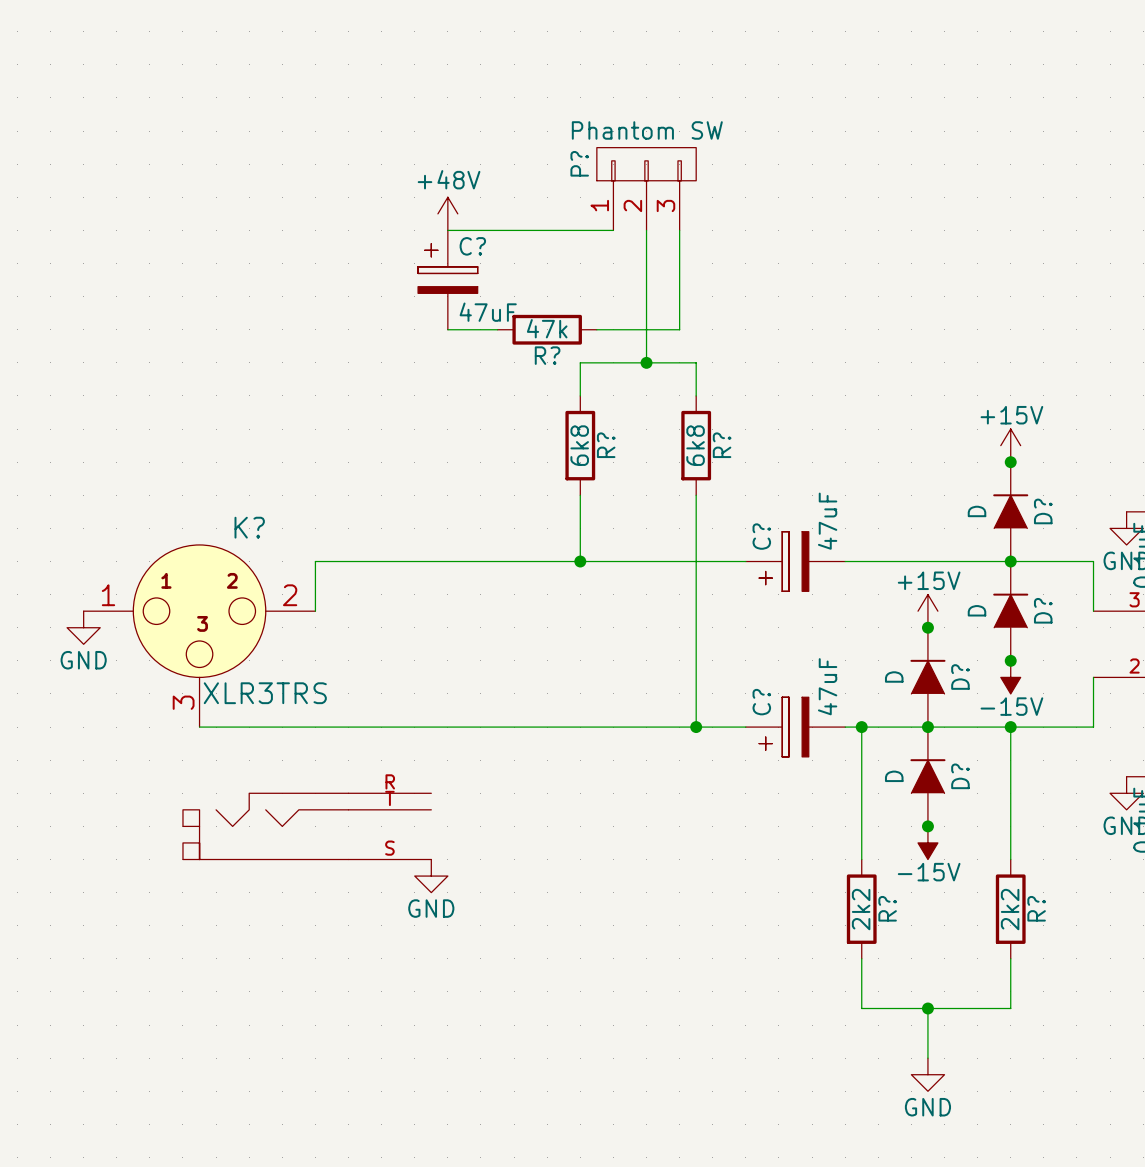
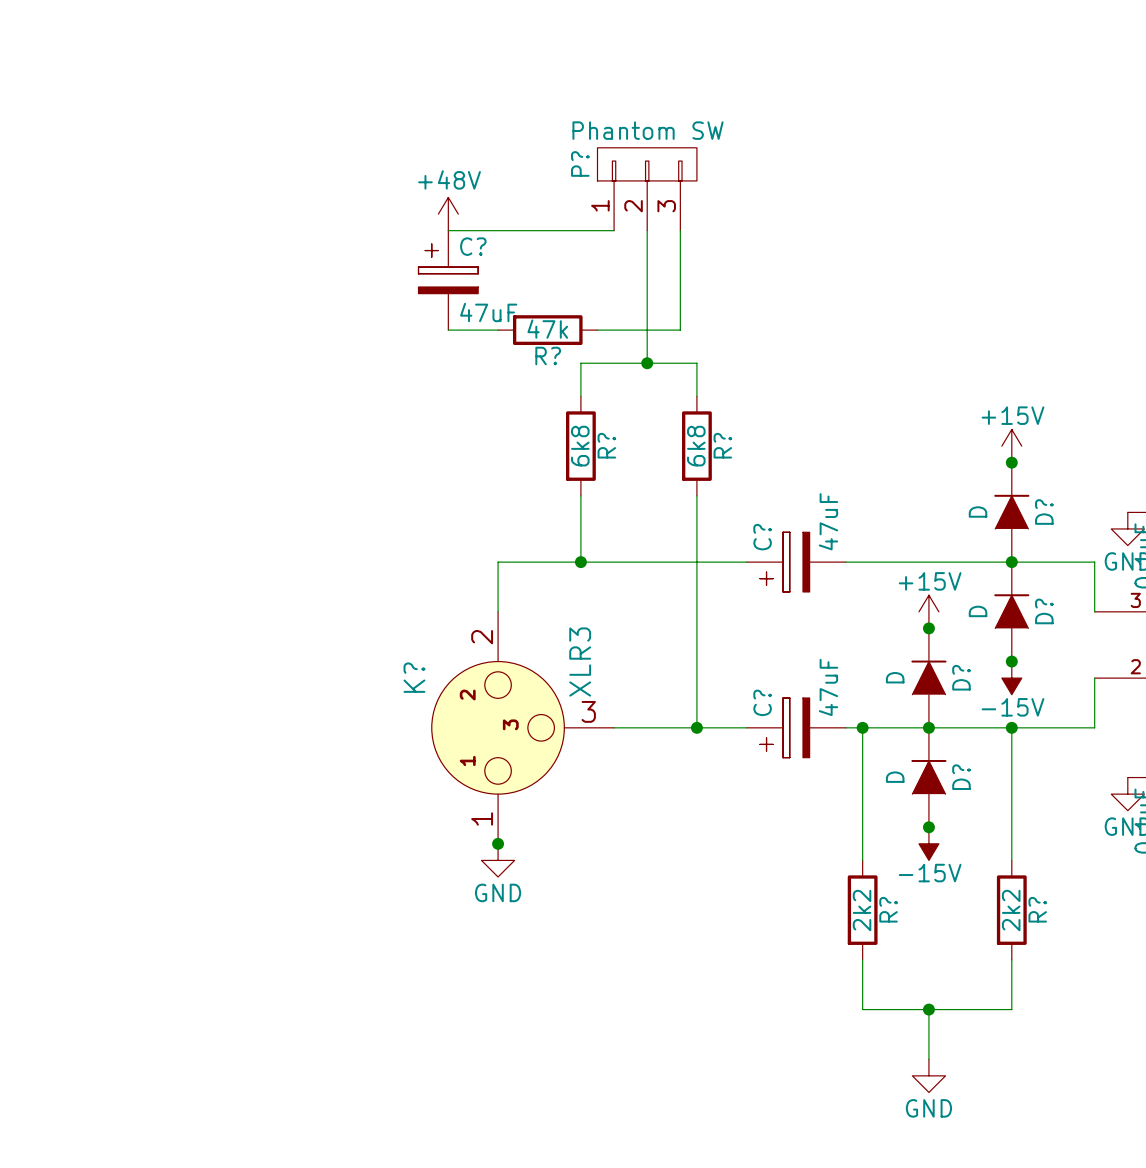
wire: (497, 561) (315, 561) (315, 611) -> (498, 562) (498, 611)
power symbol: GND (83, 627) -> none
K?: XLR3TRS (257, 702) -> none
wire: (199, 727) (613, 727) -> none
K?: none -> XLR3 (522, 727)
junction: none -> (498, 843)
power symbol position: GND (431, 876) -> GND (498, 860)

